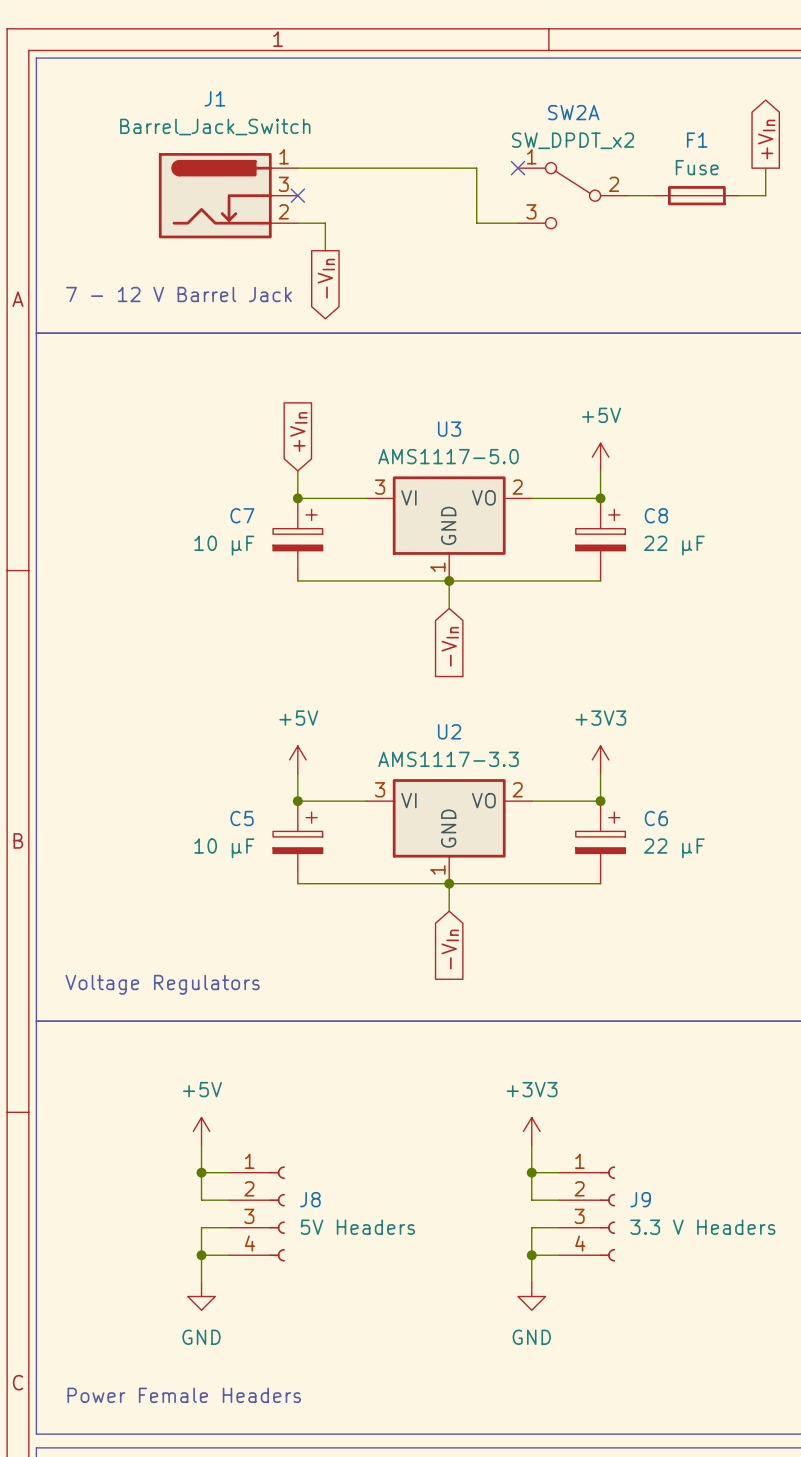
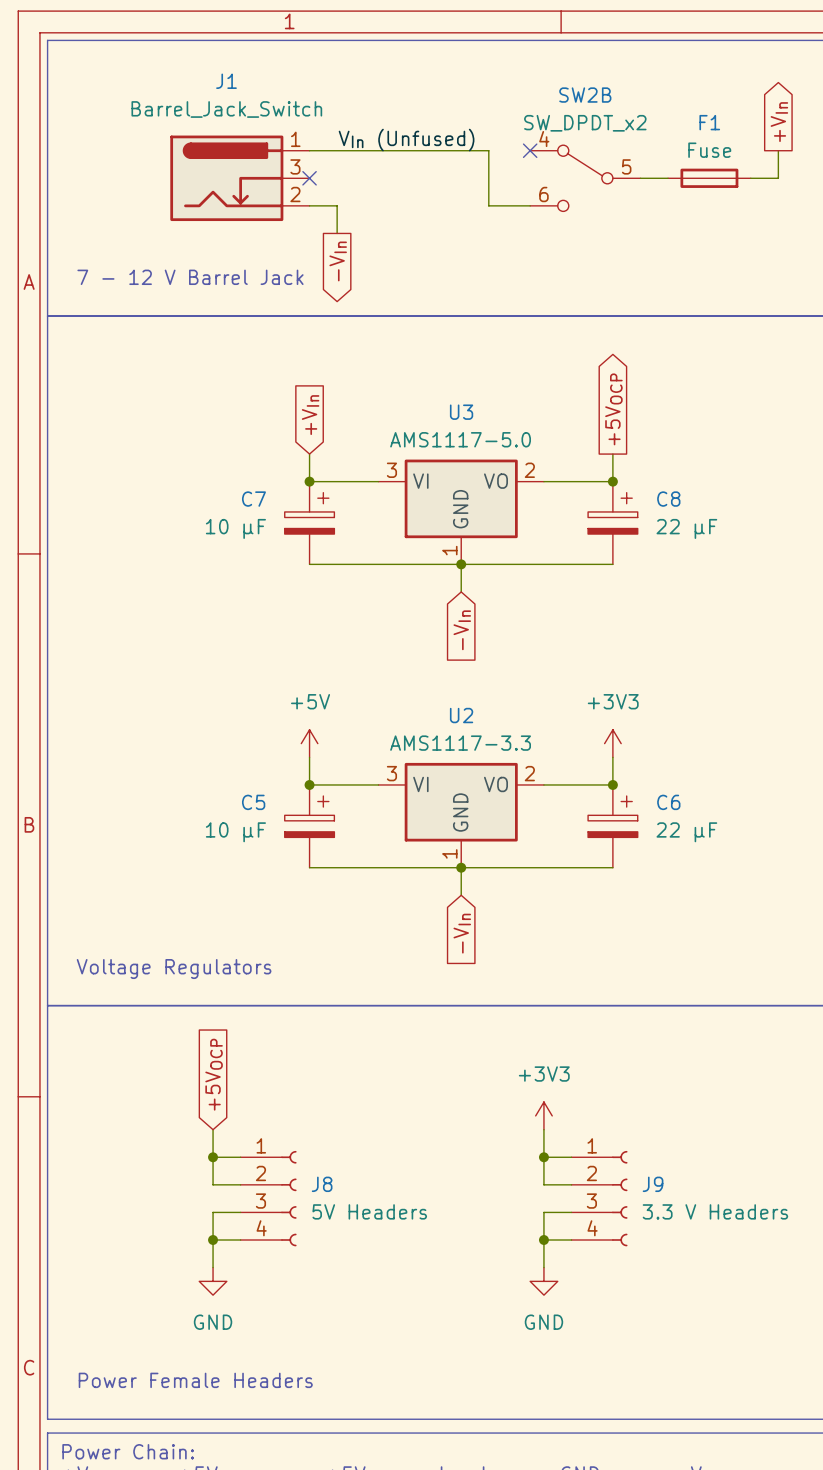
SW2A name: SW2A (573, 112) -> SW2B (585, 95)
SW2A pin number: 1 (531, 156) -> 4 (544, 139)
label: none -> VIn (Unfused) (406, 140)
SW2A pin number: 2 (614, 184) -> 5 (626, 166)
SW2A pin number: 3 (531, 211) -> 6 (543, 194)
global label: none -> +5VOCP (613, 409)
power symbol: +5V (600, 457) -> none
global label: none -> +5VOCP (214, 1074)
power symbol: +5V (201, 1131) -> none

